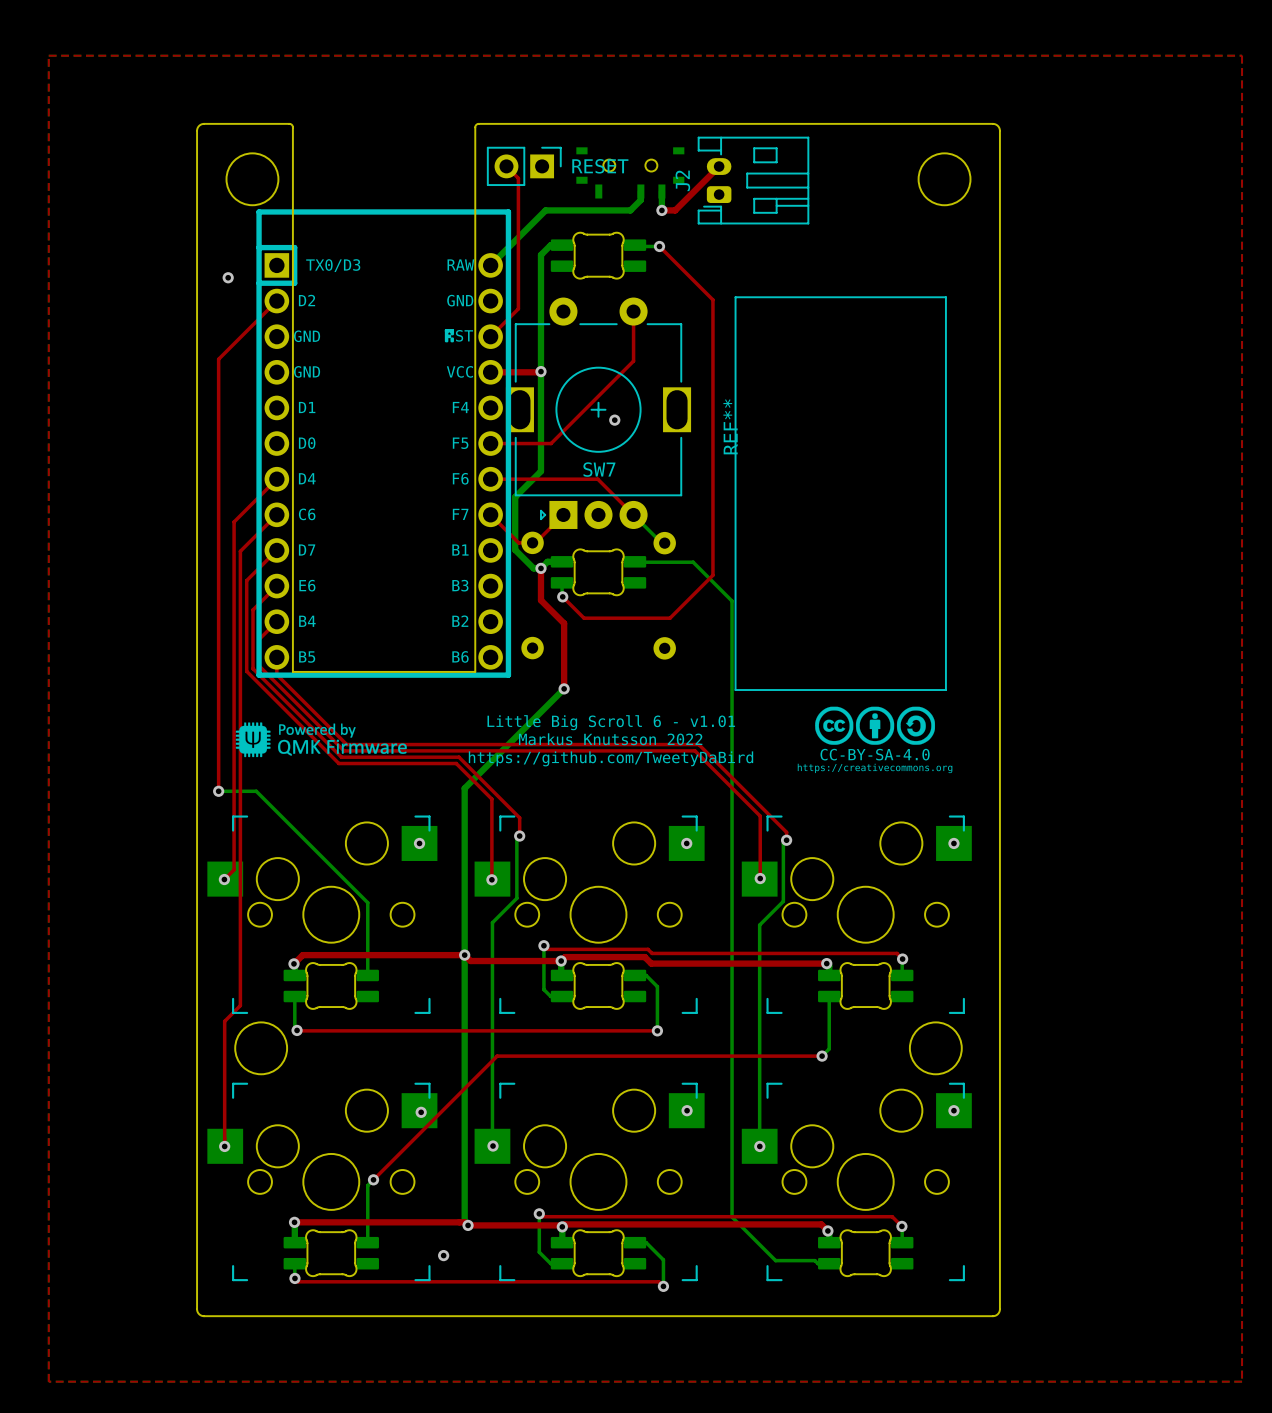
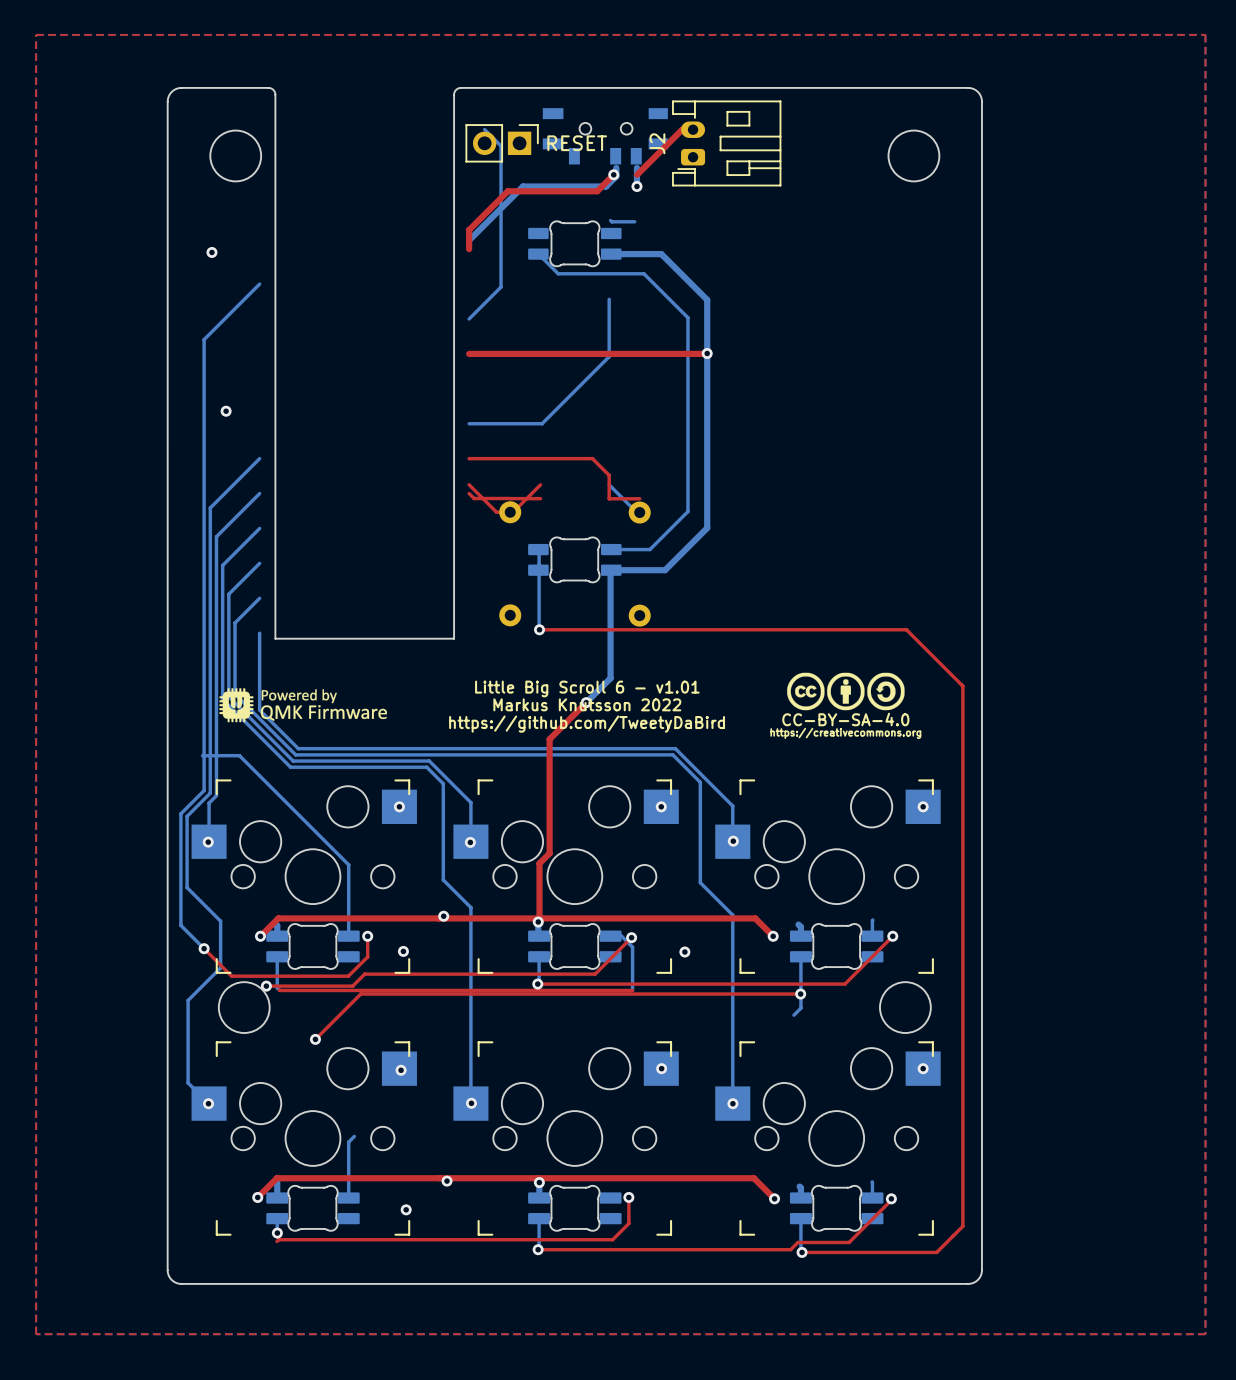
board edge: (292, 127) (289, 123) (204, 123) (199, 125) (197, 129) (197, 1312) (204, 1316) (995, 1315) (999, 1309) (999, 128) (992, 123) (478, 123) (475, 127) -> (275, 105) (274, 92) (268, 87) (179, 88) (171, 91) (167, 100) (167, 1270) (169, 1277) (174, 1281) (181, 1283) (974, 1282) (979, 1277) (981, 1270) (980, 95) (975, 90) (968, 87) (460, 87) (454, 92) (454, 105)
part footprint: [576, 147, 685, 199] -> [542, 108, 668, 165]
bottom track: none -> (484, 129) (501, 145) (501, 287) (469, 318)
top track: none -> (693, 129) (682, 129) (637, 174)
top track: (506, 166) (518, 178) (518, 308) (490, 336) -> none
top track: (719, 166) (675, 210) (661, 210) -> none
J2 position: (753, 180) -> (726, 143)
top track: none -> (613, 174) (597, 191) (507, 191) (469, 230) (469, 249)
part footprint: [550, 232, 647, 280] -> [528, 220, 622, 267]
bottom track: (562, 245) (550, 245) (540, 254) (540, 471) (515, 497) (515, 549) (533, 568) (540, 568) (547, 561) (562, 561) -> none
top track: (659, 246) (712, 299) (712, 575) (670, 618) (584, 618) (562, 596) -> none
via position: (659, 246) -> (613, 174)
bottom track: none -> (539, 254) (558, 273) (643, 273) (687, 317) (687, 511) (649, 549) (610, 549)
bottom track: none -> (610, 254) (661, 254) (707, 299) (707, 528) (665, 570) (610, 570) (610, 678) (586, 702)
top track: (276, 301) (218, 359) (218, 791) -> none
bottom track: none -> (259, 284) (204, 339) (204, 790) (180, 813) (180, 925) (204, 948)
top track: (633, 311) (633, 361) (551, 443) (490, 443) -> none
bottom track: none -> (609, 299) (609, 356) (542, 423) (469, 423)
top track: (540, 371) (490, 372) -> none
via: (540, 371) -> none
top track: none -> (707, 353) (469, 353)
via: none -> (707, 353)
SW7: (598, 413) -> none
via: (614, 420) -> none
via: none -> (226, 411)
part: (383, 443) -> none
top track: (276, 479) (234, 521) (234, 869) (224, 879) -> none
top track: (490, 479) (597, 479) (633, 514) -> none
bottom track: none -> (259, 458) (210, 508) (210, 793) (187, 816) (187, 887) (220, 921) (220, 967) (188, 1000) (188, 1082) (209, 1103)
top track: none -> (469, 458) (592, 458) (609, 475) (609, 498)
REF**: (840, 493) -> none
top track: (276, 514) (240, 551) (240, 1005) (224, 1021) (224, 1146) -> none
bottom track: none -> (259, 493) (216, 536) (216, 795) (209, 803) (209, 841)
top track: none -> (469, 493) (474, 498) (510, 498)
top track: none -> (510, 498) (540, 498)
top track: none -> (609, 498) (639, 498)
top track: (276, 550) (246, 580) (246, 671) (338, 763) (456, 763) (491, 799) (491, 879) -> none
bottom track: (634, 561) (693, 562) (732, 601) (732, 1217) (775, 1260) (814, 1260) (818, 1263) (829, 1263) -> (802, 1252) (800, 1218)
top track: (540, 568) (540, 600) (564, 623) (564, 688) -> none
via: (540, 568) -> none
part: (598, 572) -> none
top track: (276, 586) (253, 609) (253, 668) (341, 757) (459, 757) (519, 817) (519, 836) -> none
part: none -> (574, 559)
bottom track: none -> (259, 563) (228, 594) (228, 696) (293, 761) (429, 761) (470, 802) (470, 841)
via: (562, 596) -> none
bottom track: none -> (539, 570) (539, 629)
top track: (276, 621) (259, 639) (259, 666) (344, 750) (695, 750) (760, 816) (760, 878) -> none
top track: (276, 657) (276, 674) (346, 744) (698, 744) (786, 832) (786, 840) -> none
top track: none -> (539, 629) (906, 629) (962, 686) (962, 1226) (936, 1252) (802, 1252)
bottom track: none -> (259, 633) (259, 710) (298, 748) (675, 748) (732, 806) (732, 841)
bottom track: (564, 688) (464, 788) (464, 1222) (468, 1225) -> none
via position: (564, 688) -> (539, 629)
top track: none -> (586, 702) (549, 739) (549, 853) (539, 863) (539, 918)
via: none -> (586, 702)
via: (218, 791) -> none
bottom track: (519, 836) (516, 838) (516, 898) (492, 922) (492, 946) -> (259, 528) (222, 565) (222, 699) (290, 767) (426, 767) (443, 783) (443, 879) (470, 907)
via: (519, 836) -> none
bottom track: (786, 840) (783, 843) (783, 901) (759, 925) (759, 954) -> (259, 598) (235, 622) (235, 694) (295, 754) (672, 754) (700, 782) (700, 882) (732, 915)
via: (786, 840) -> none
top track: (543, 945) (547, 949) (648, 949) (652, 953) (896, 953) (902, 959) -> none
bottom track: (543, 945) (543, 989) (550, 996) (562, 996) -> (537, 984) (539, 956)
via: (543, 945) -> none
via position: (902, 959) -> (892, 936)
via position: (293, 963) -> (260, 936)
top track: (826, 963) (651, 963) (644, 957) (565, 957) (561, 961) (470, 961) (464, 955) (302, 955) (293, 963) -> none
via position: (826, 963) -> (773, 936)
top track: none -> (260, 936) (278, 918) (755, 918) (773, 936)
top track: none -> (367, 936) (367, 956) (348, 976) (231, 976) (204, 948)
via: none -> (367, 936)
top track: none -> (892, 936) (844, 984) (537, 984)
top track: none -> (631, 937) (595, 974) (364, 974) (352, 986) (266, 986)
via: none -> (631, 937)
via: none -> (204, 948)
via: none -> (403, 951)
via: none -> (684, 952)
via: none -> (537, 984)
via position: (297, 1030) -> (266, 986)
via: (657, 1030) -> none
top track: none -> (800, 994) (360, 994) (315, 1039)
top track: (822, 1056) (497, 1056) (373, 1179) -> none
via position: (822, 1056) -> (800, 994)
via: none -> (315, 1039)
via: (373, 1179) -> none
top track: (539, 1213) (542, 1216) (892, 1216) (901, 1226) -> none
bottom track: (539, 1213) (539, 1252) (550, 1263) (562, 1263) -> (538, 1249) (539, 1218)
via: (539, 1213) -> none
top track: (294, 1222) (464, 1222) (468, 1225) (562, 1226) (564, 1224) (821, 1224) (827, 1230) -> none
via position: (294, 1222) -> (257, 1197)
via position: (901, 1226) -> (891, 1198)
via position: (827, 1230) -> (774, 1198)
top track: none -> (257, 1197) (276, 1178) (753, 1178) (774, 1198)
bottom track: (634, 1242) (646, 1242) (663, 1259) (663, 1286) -> none
top track: none -> (628, 1197) (628, 1223) (612, 1239) (278, 1239) (276, 1241)
top track: none -> (891, 1198) (849, 1242) (797, 1242) (790, 1249) (538, 1249)
via position: (443, 1255) -> (406, 1209)
top track: (294, 1278) (298, 1281) (658, 1281) (663, 1286) -> none
via position: (663, 1286) -> (628, 1197)
via: none -> (538, 1249)
via: none -> (802, 1252)

